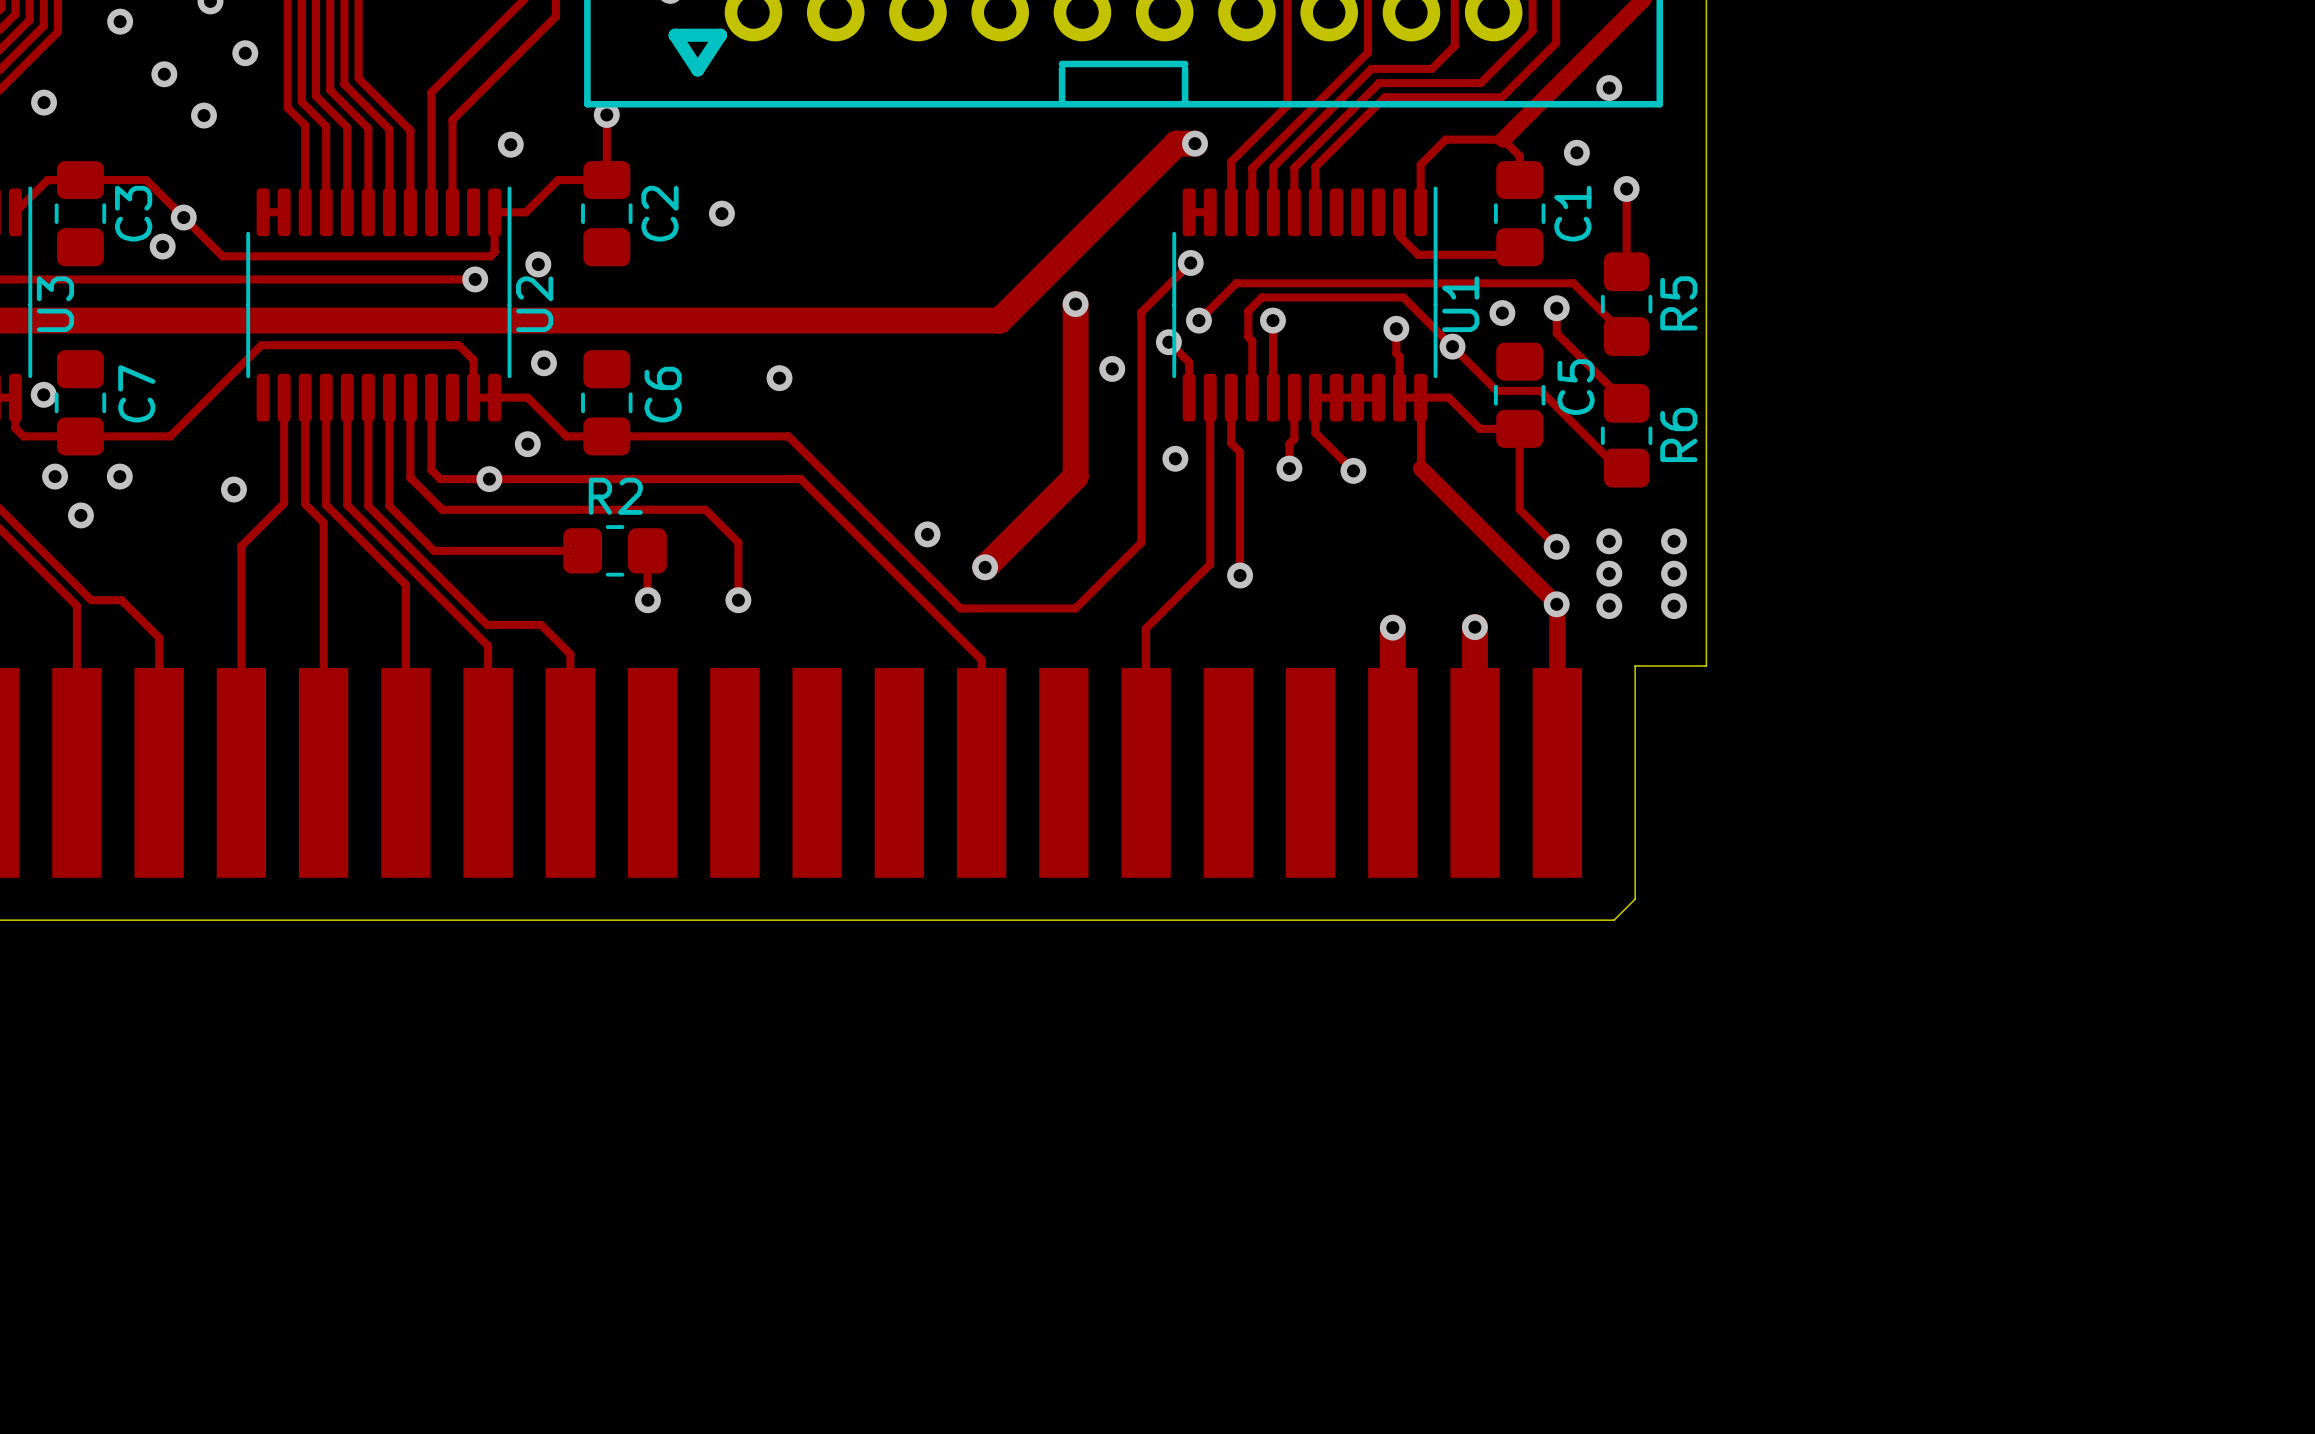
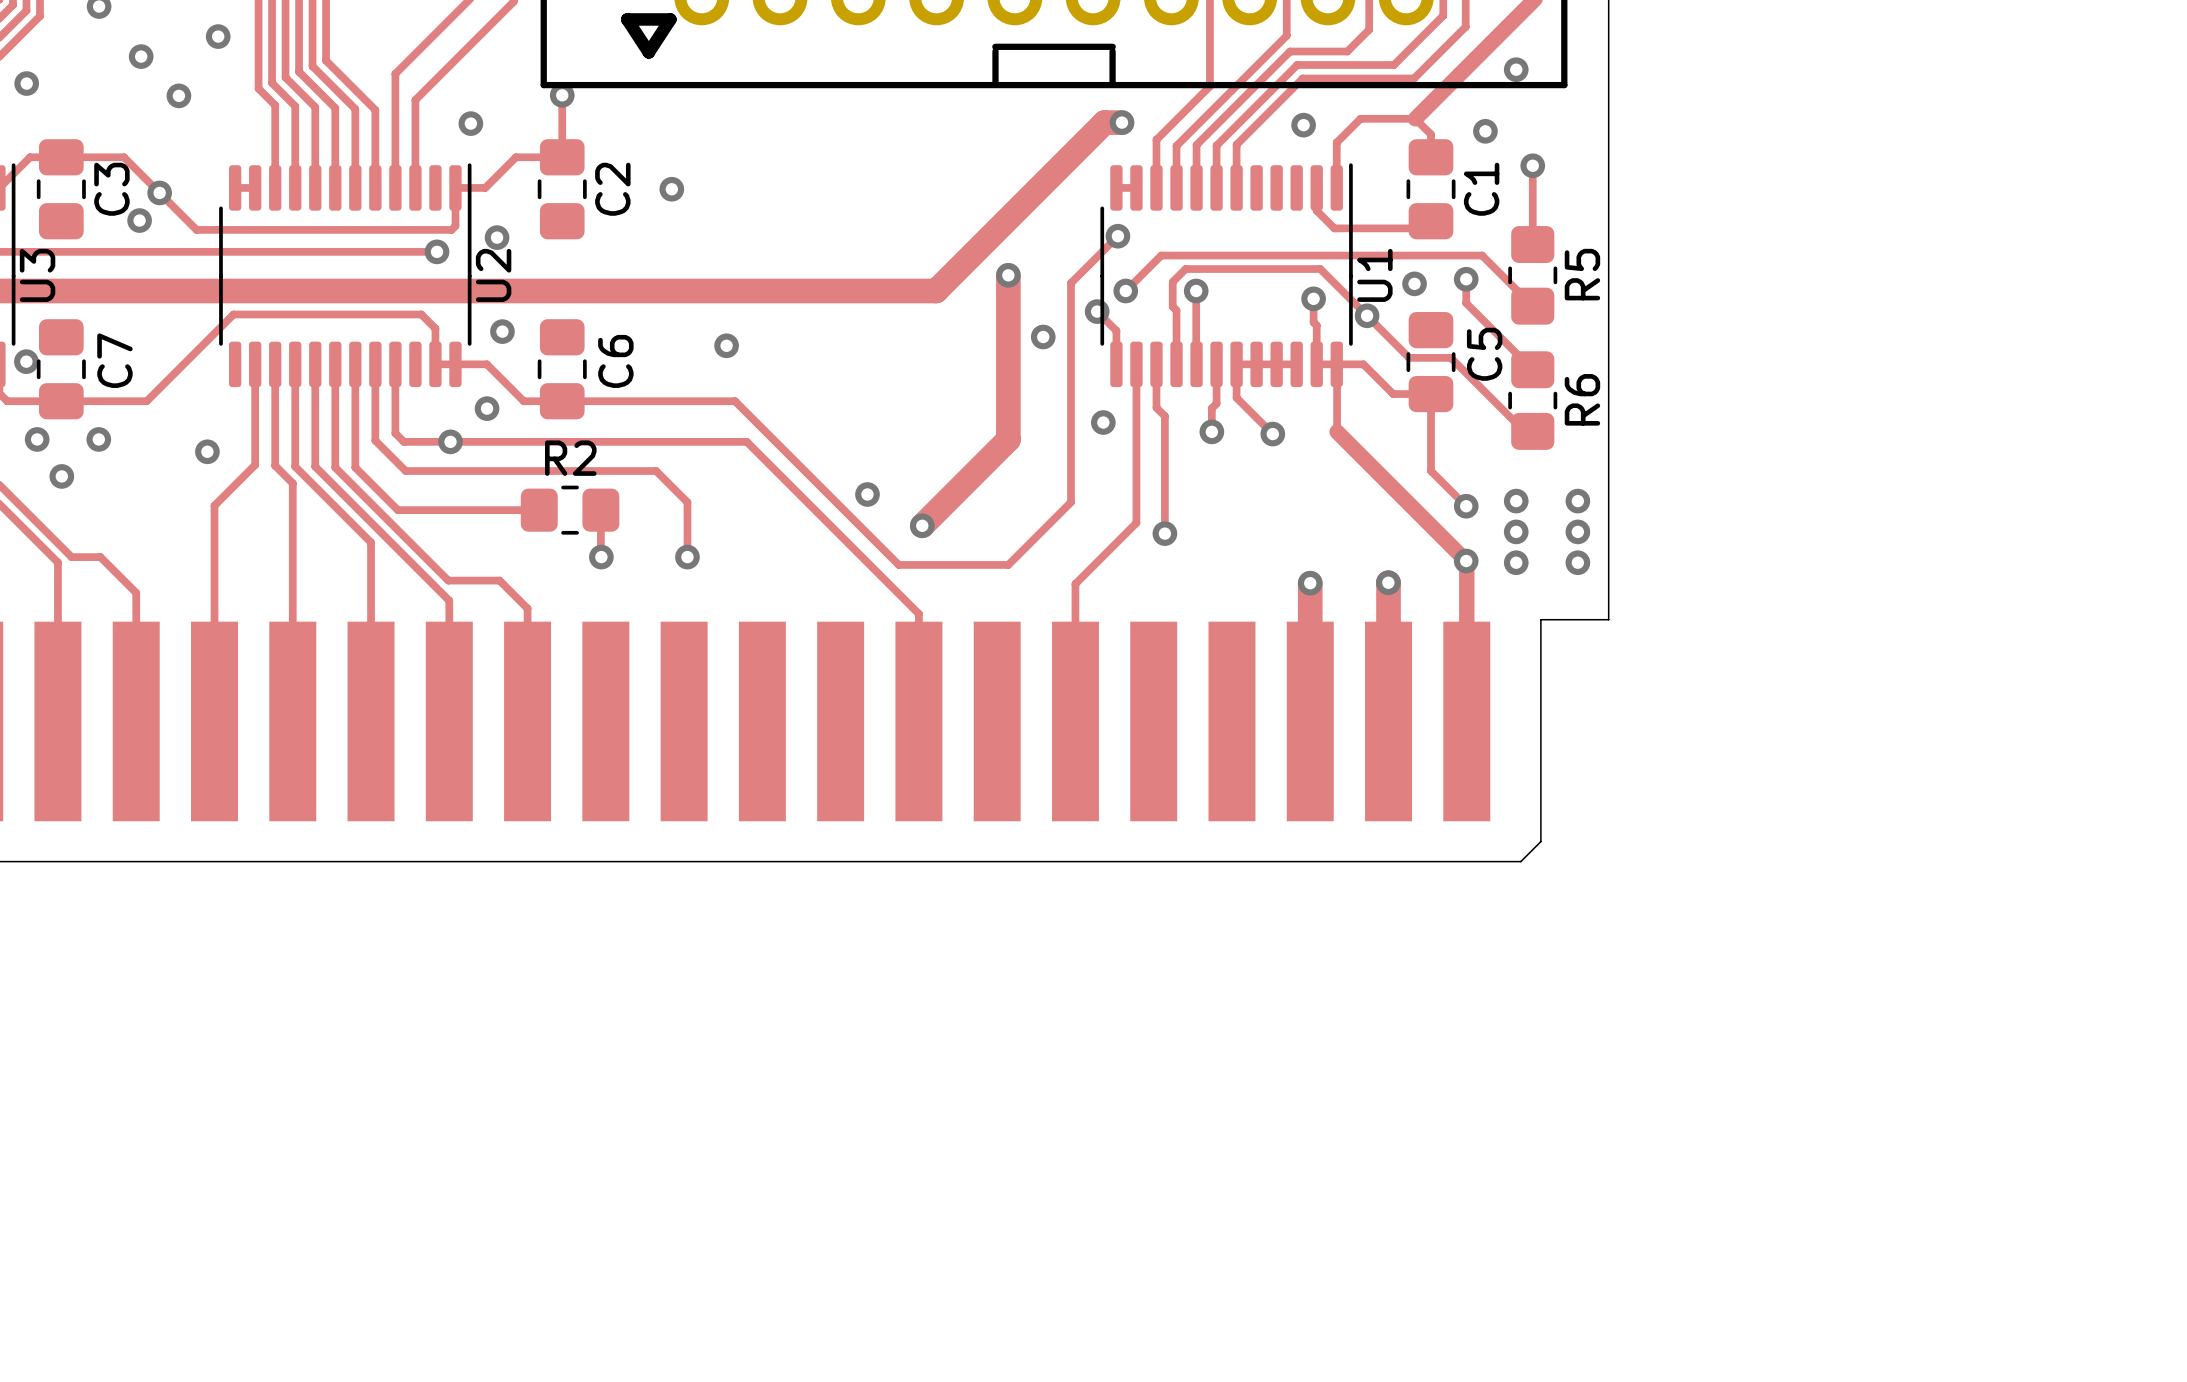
via: none -> (1303, 125)

